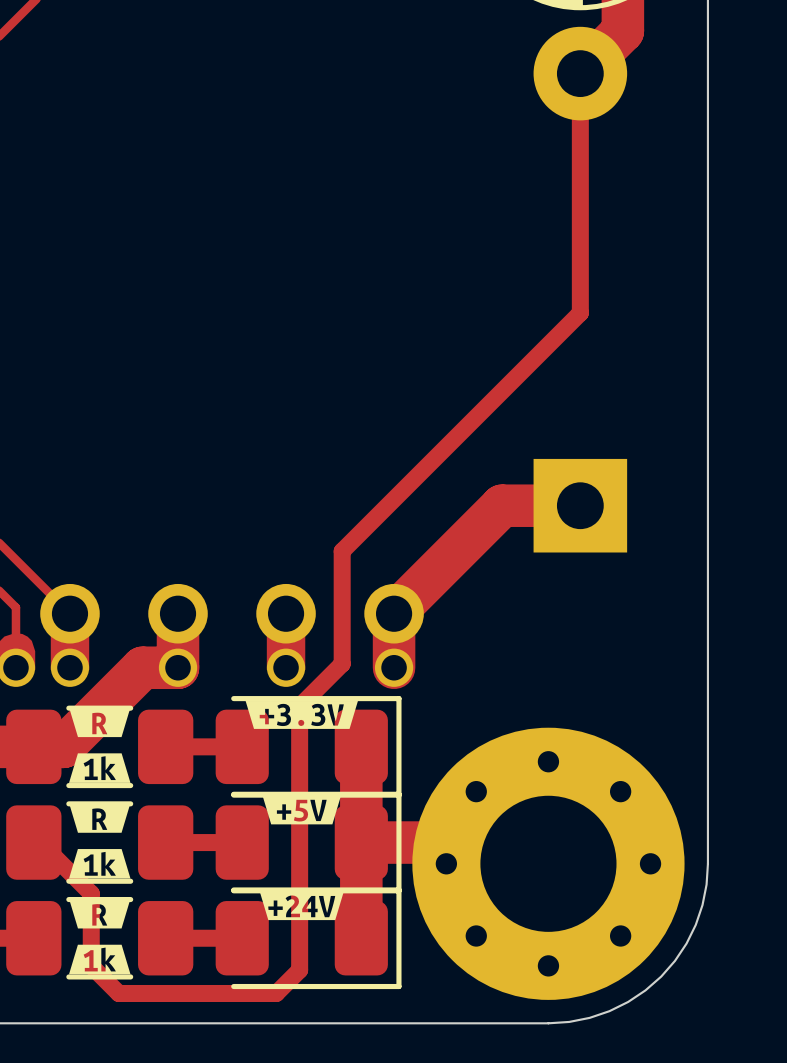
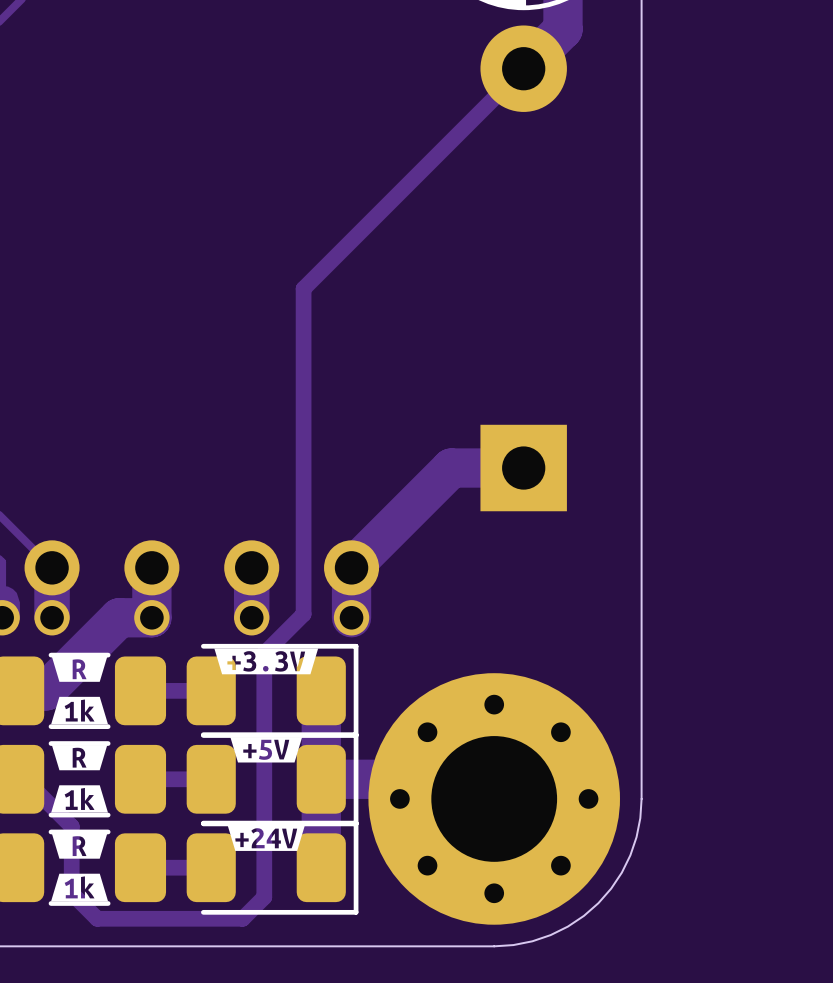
track: (580, 73) (580, 313) (342, 551) -> (523, 68) (303, 288) (303, 510)

